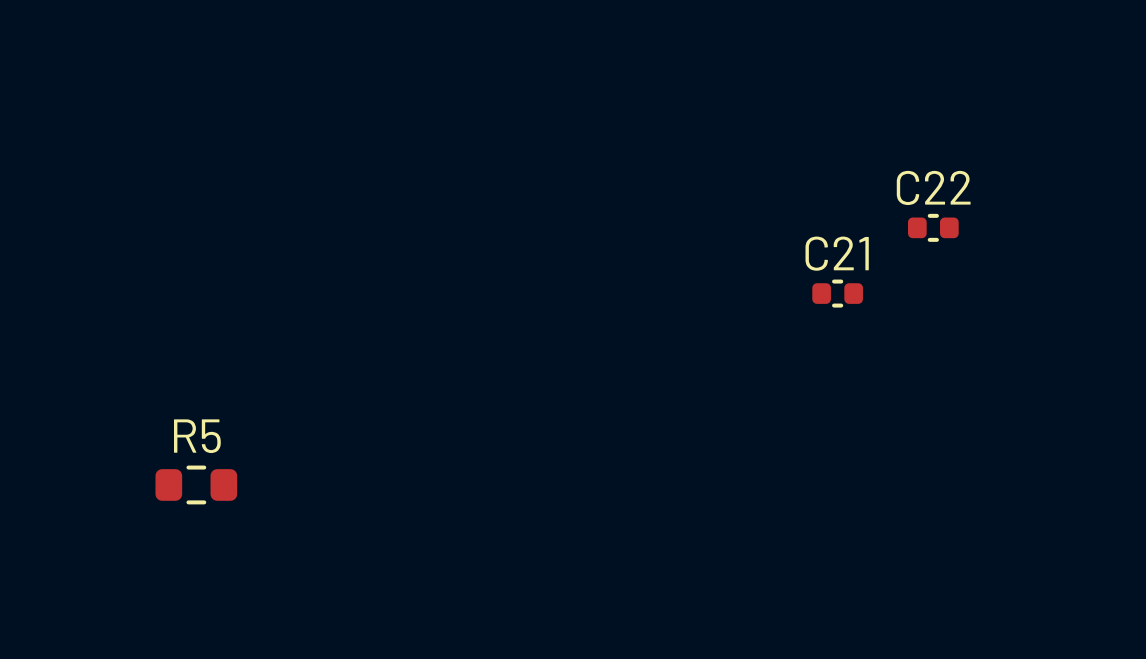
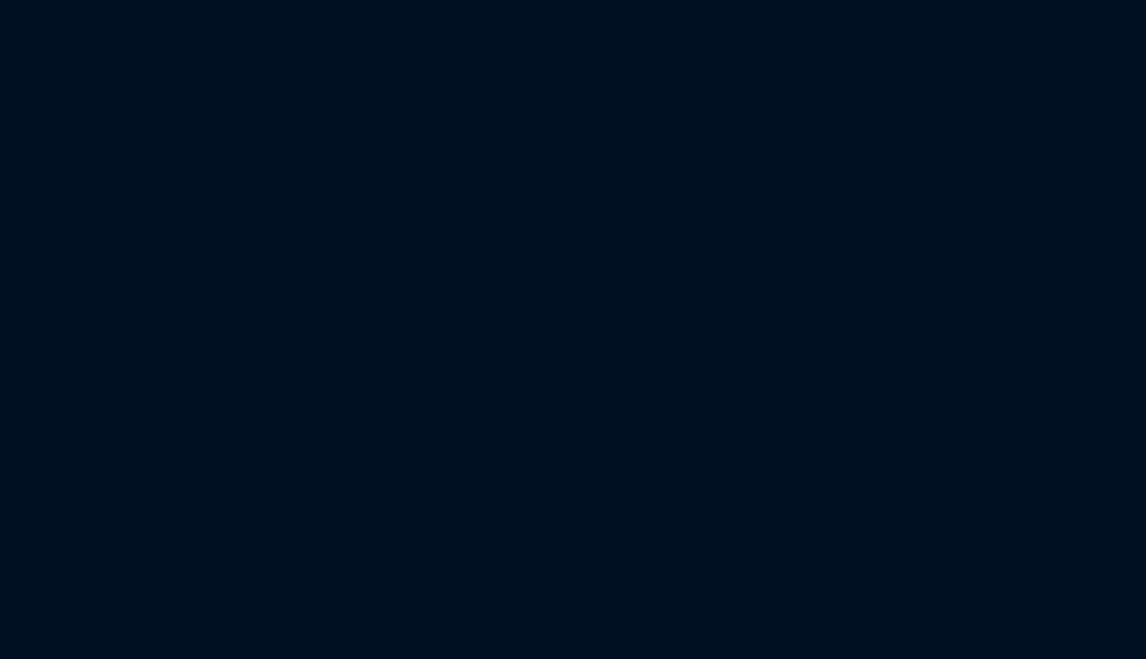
C22: (933, 227) -> none
C21: (837, 293) -> none
R5: (196, 484) -> none

